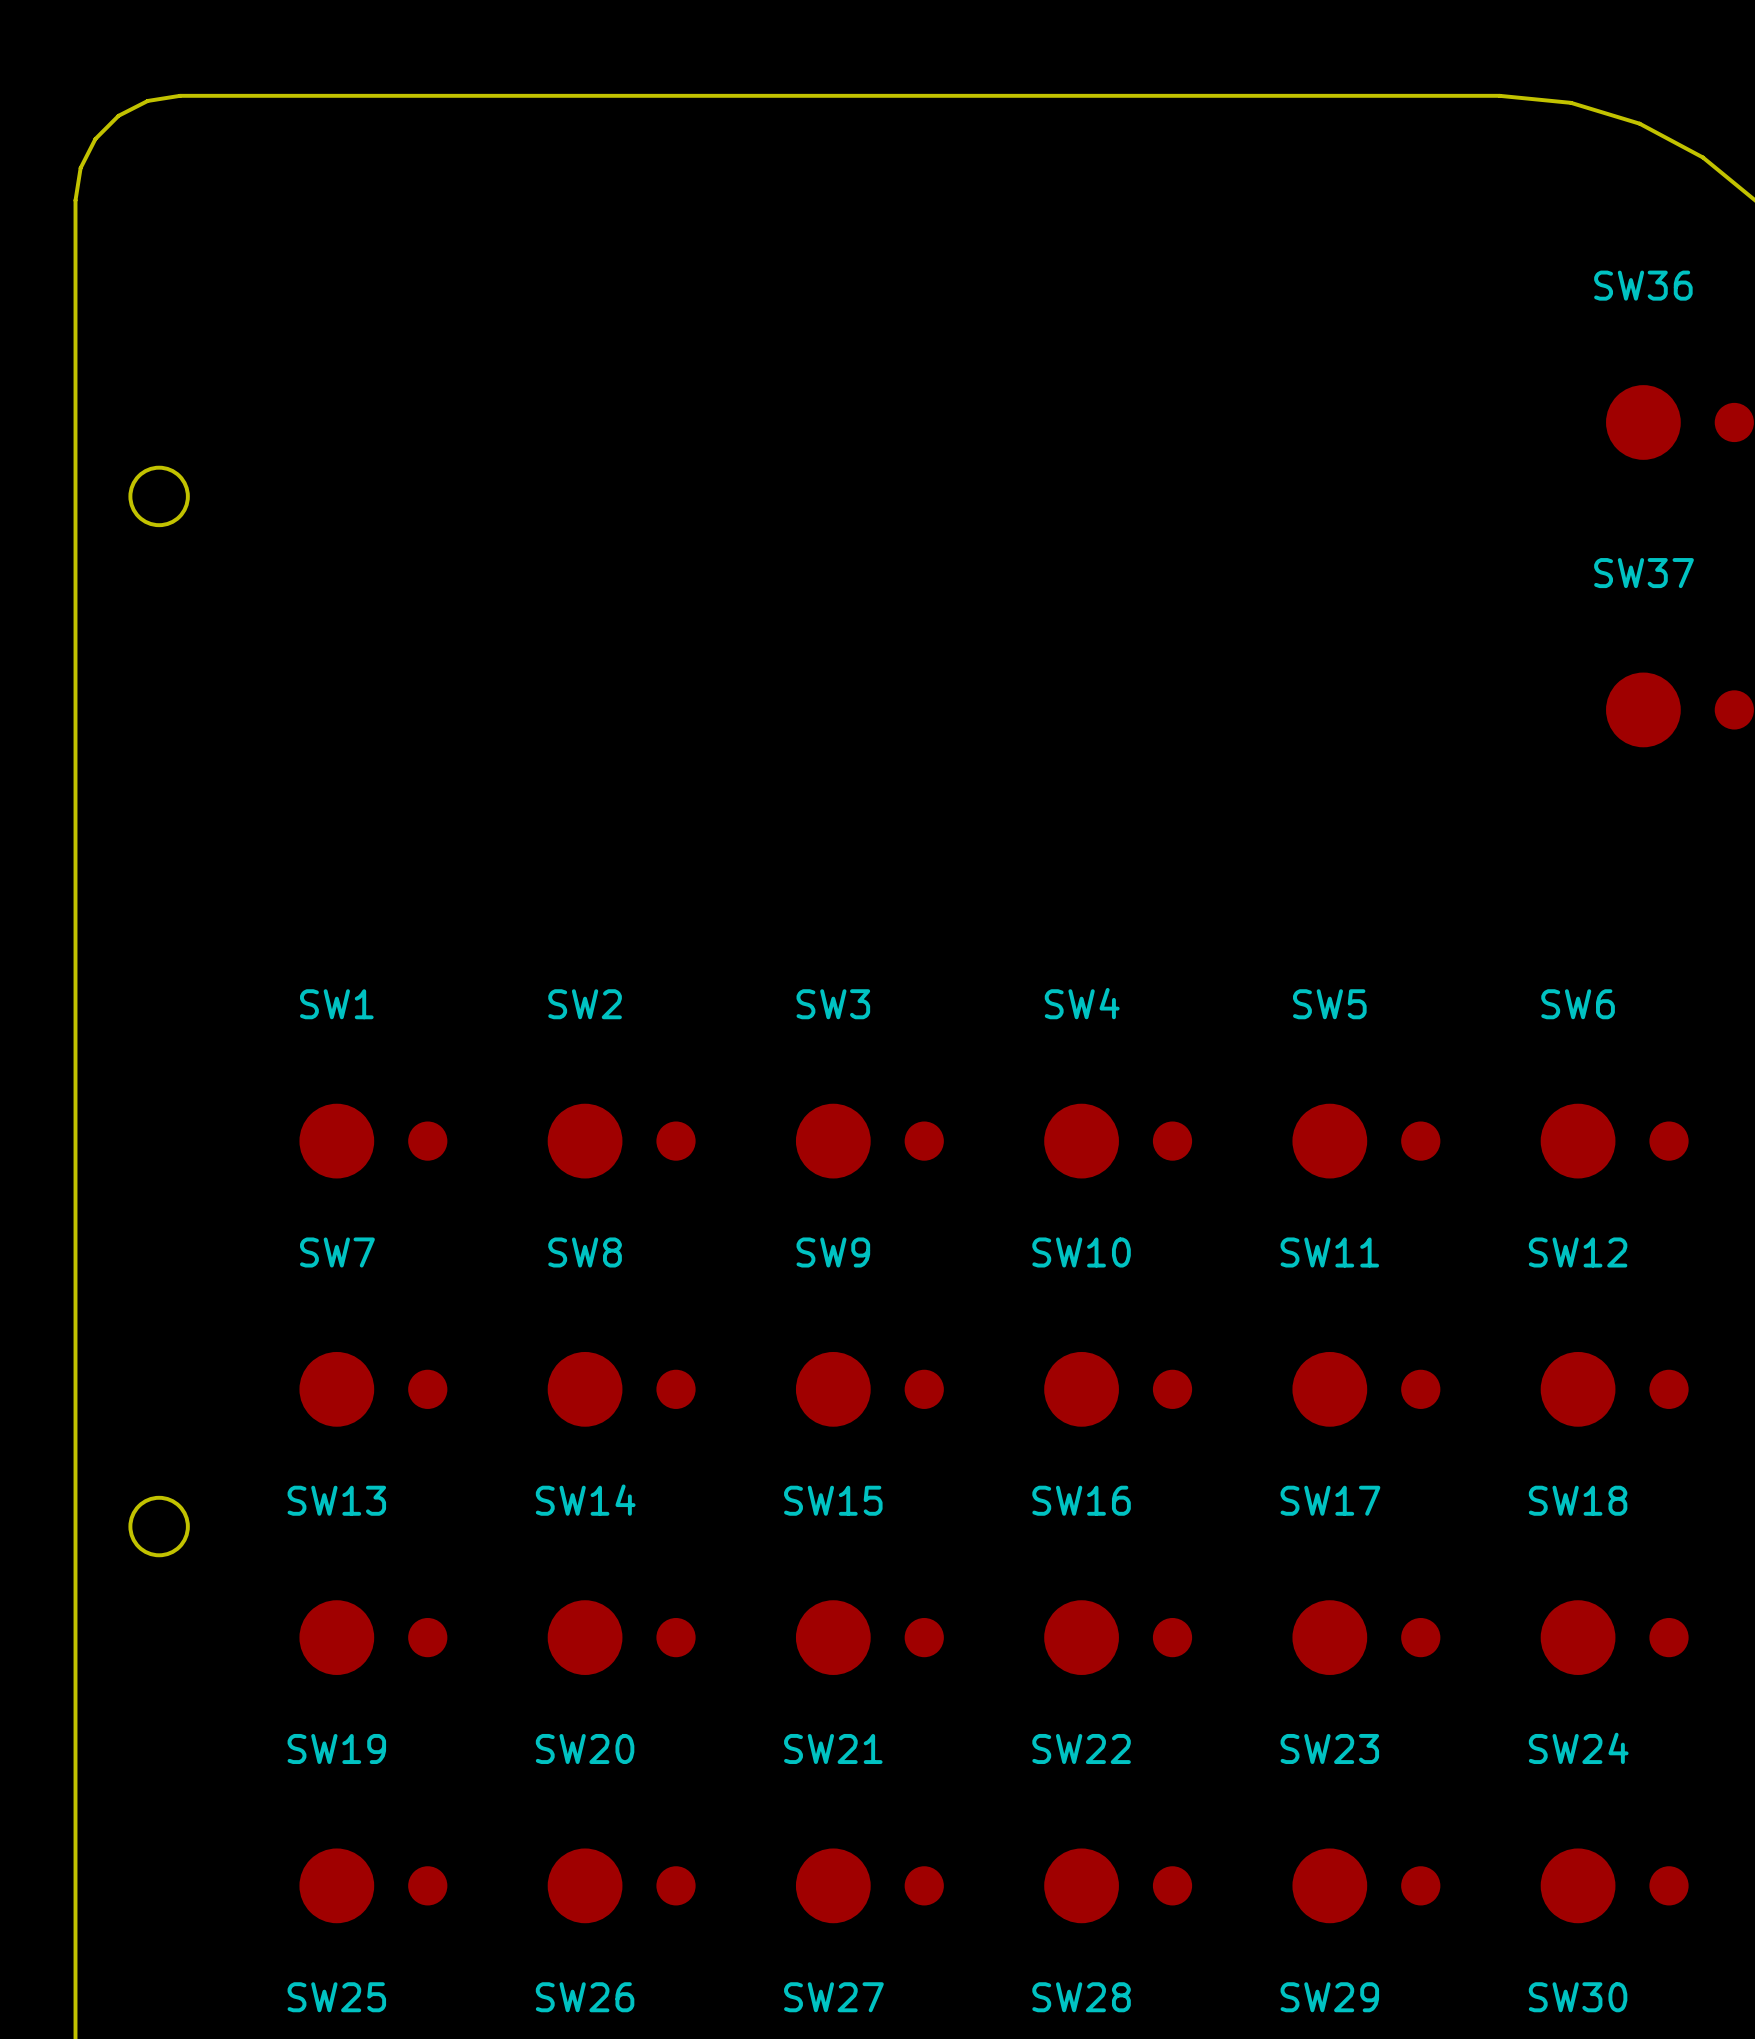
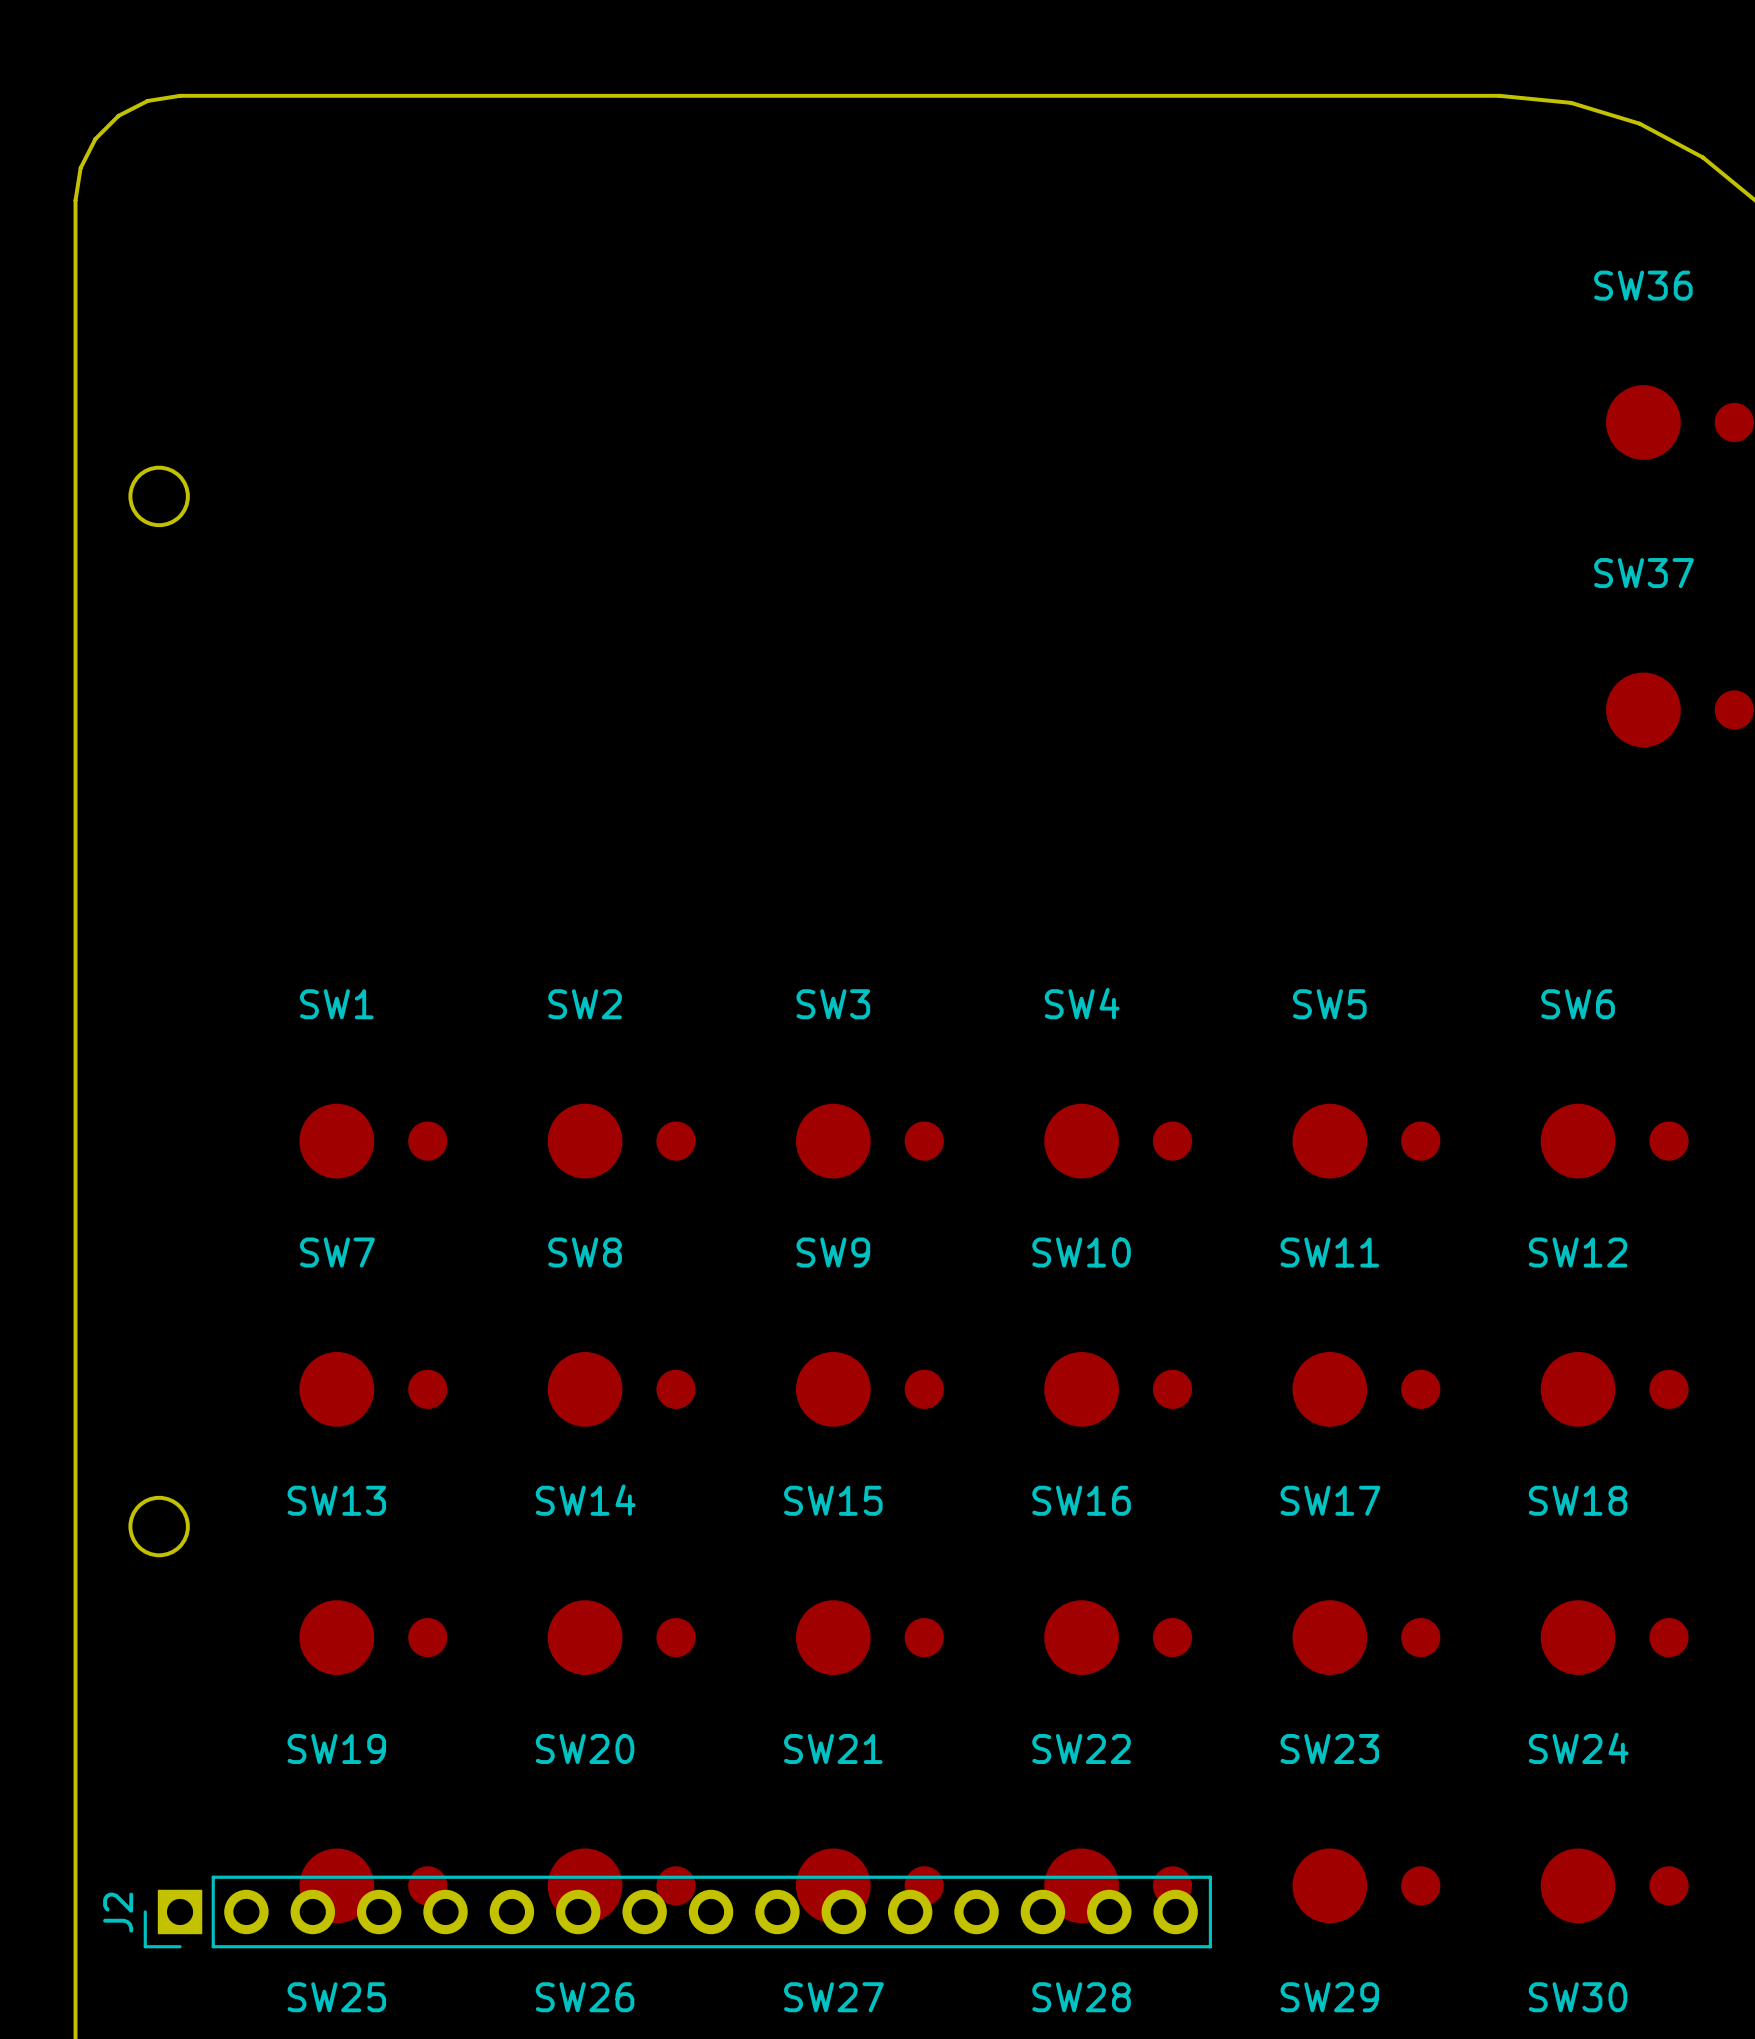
J2: none -> (677, 1911)

